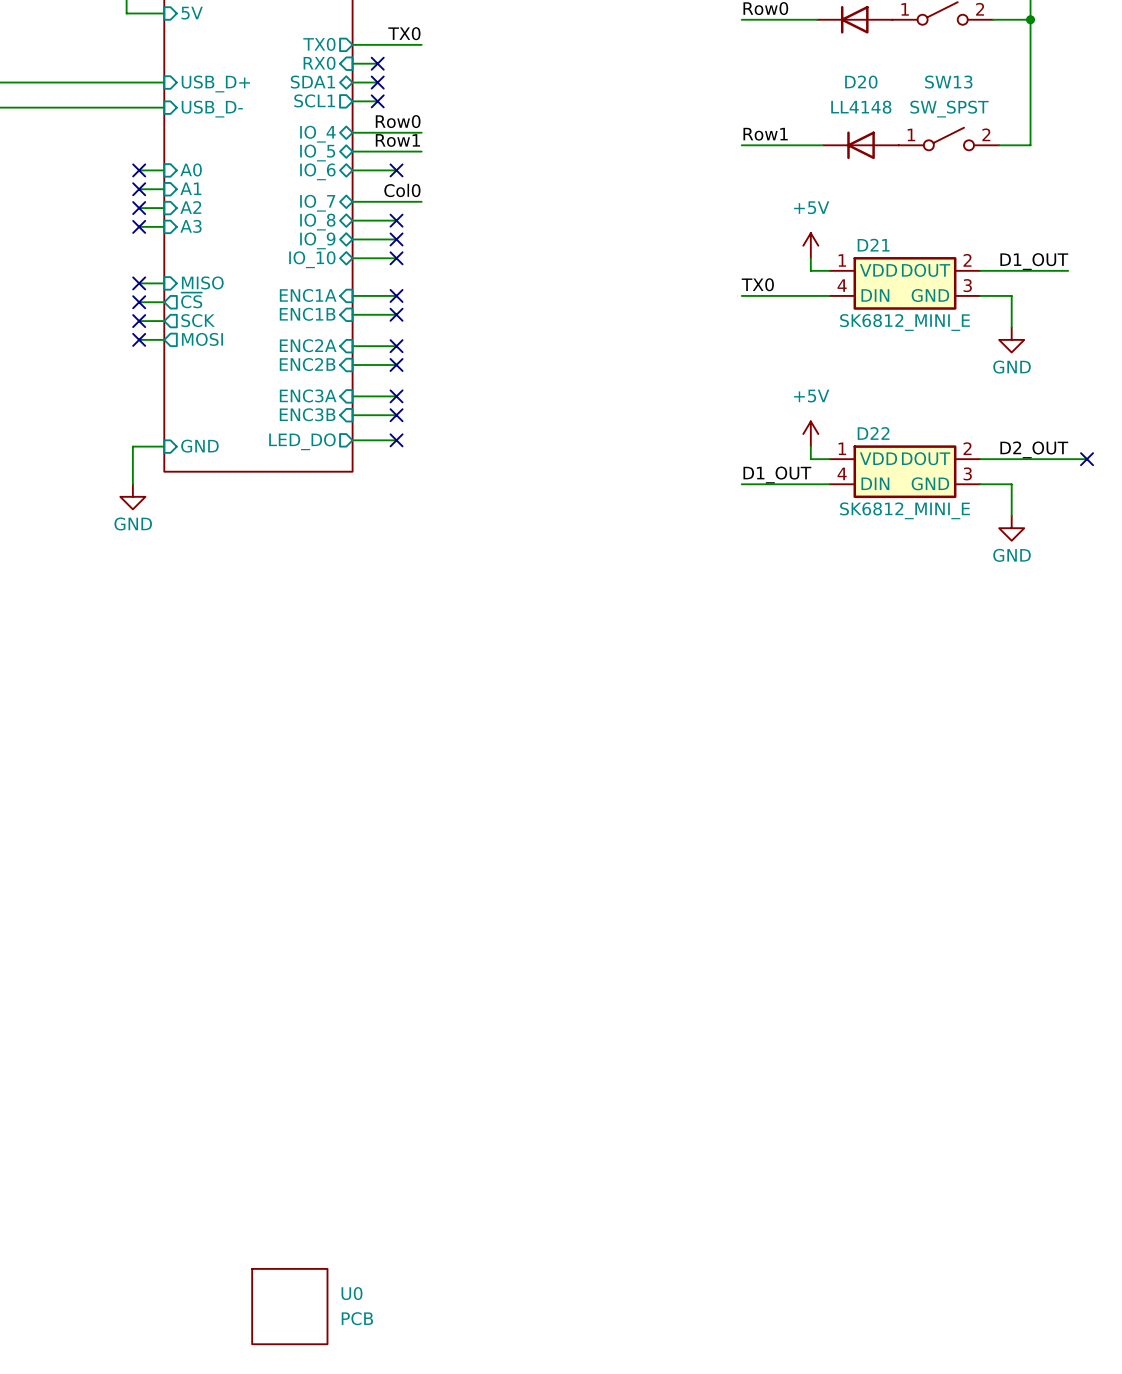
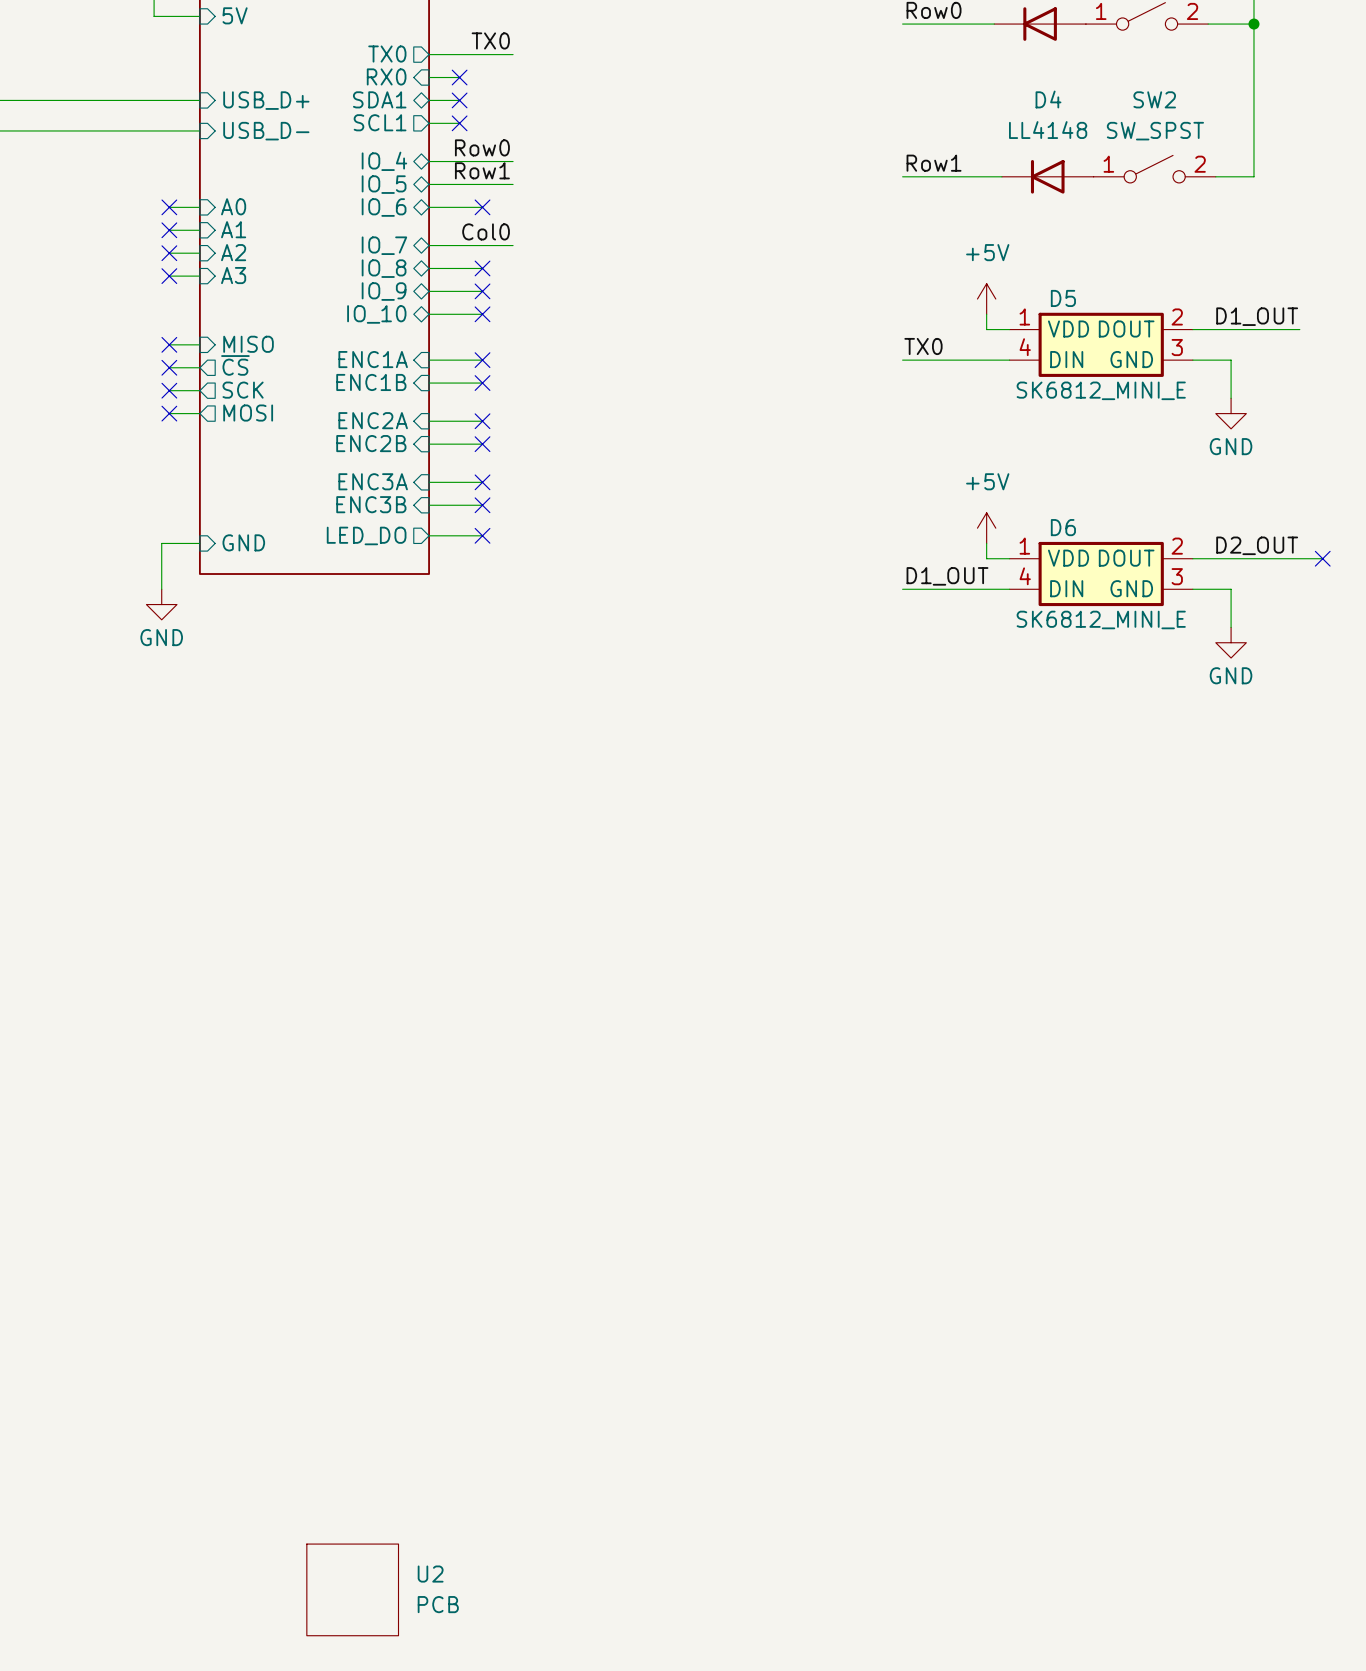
D20 name: D20 (861, 82) -> D4 (1048, 99)
SW13 name: SW13 (948, 82) -> SW2 (1154, 99)
D21 name: D21 (873, 245) -> D5 (1063, 298)
D22 name: D22 (873, 433) -> D6 (1063, 527)
U0 name: U0 (352, 1293) -> U2 (430, 1574)

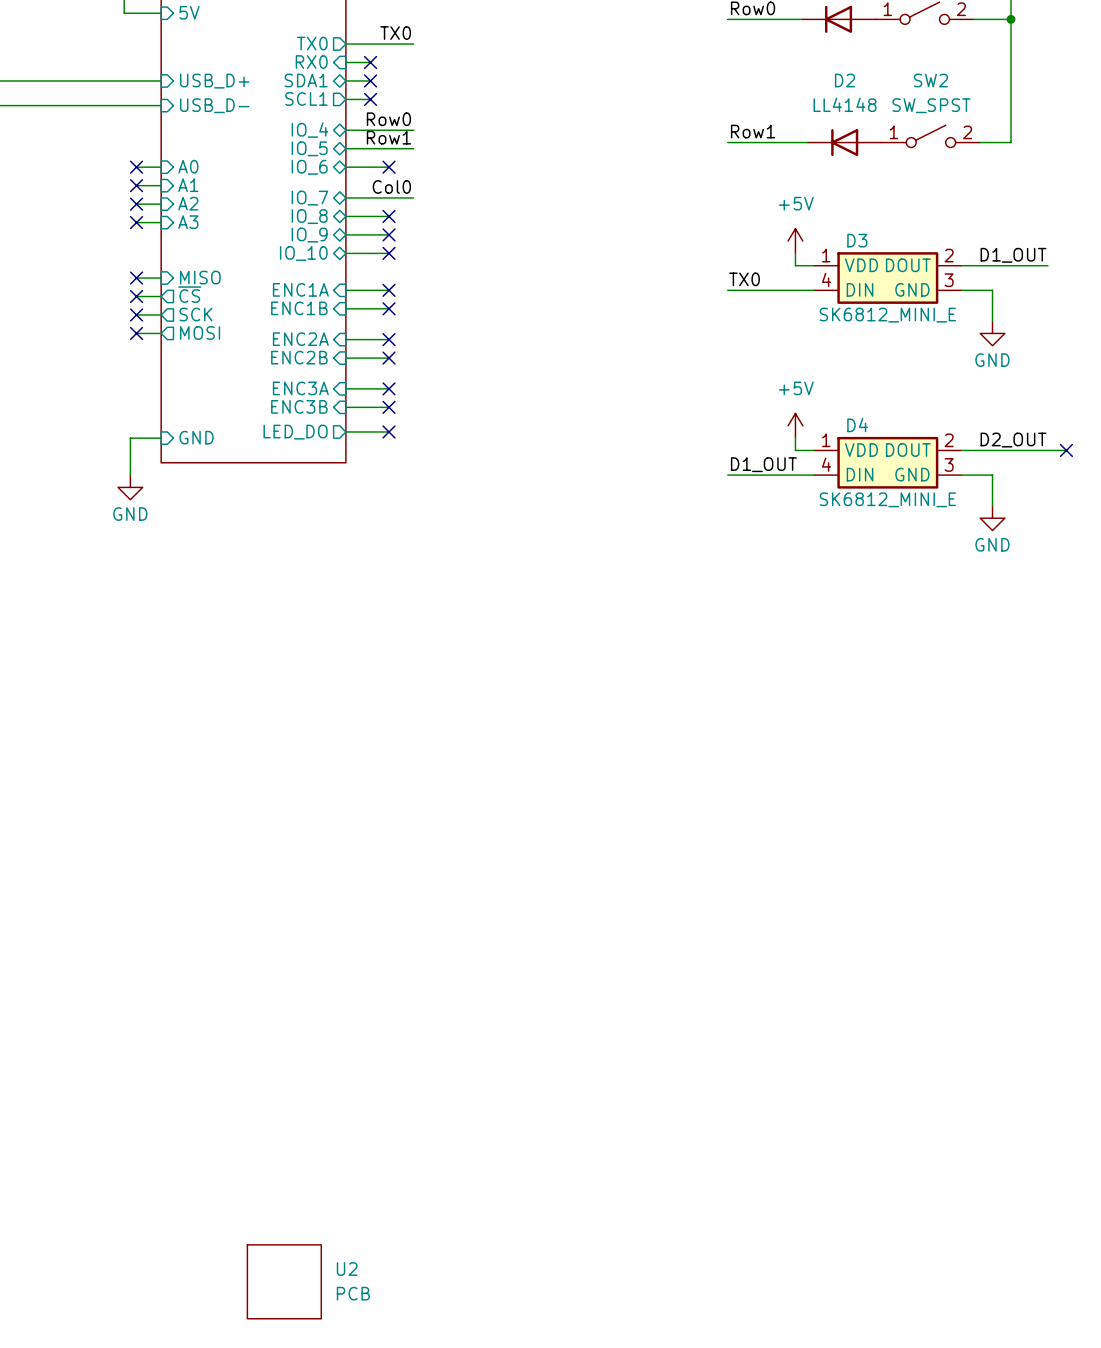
D4 name: D4 (1048, 99) -> D2 (845, 80)
D5 name: D5 (1063, 298) -> D3 (857, 240)
D6 name: D6 (1063, 527) -> D4 (857, 425)

